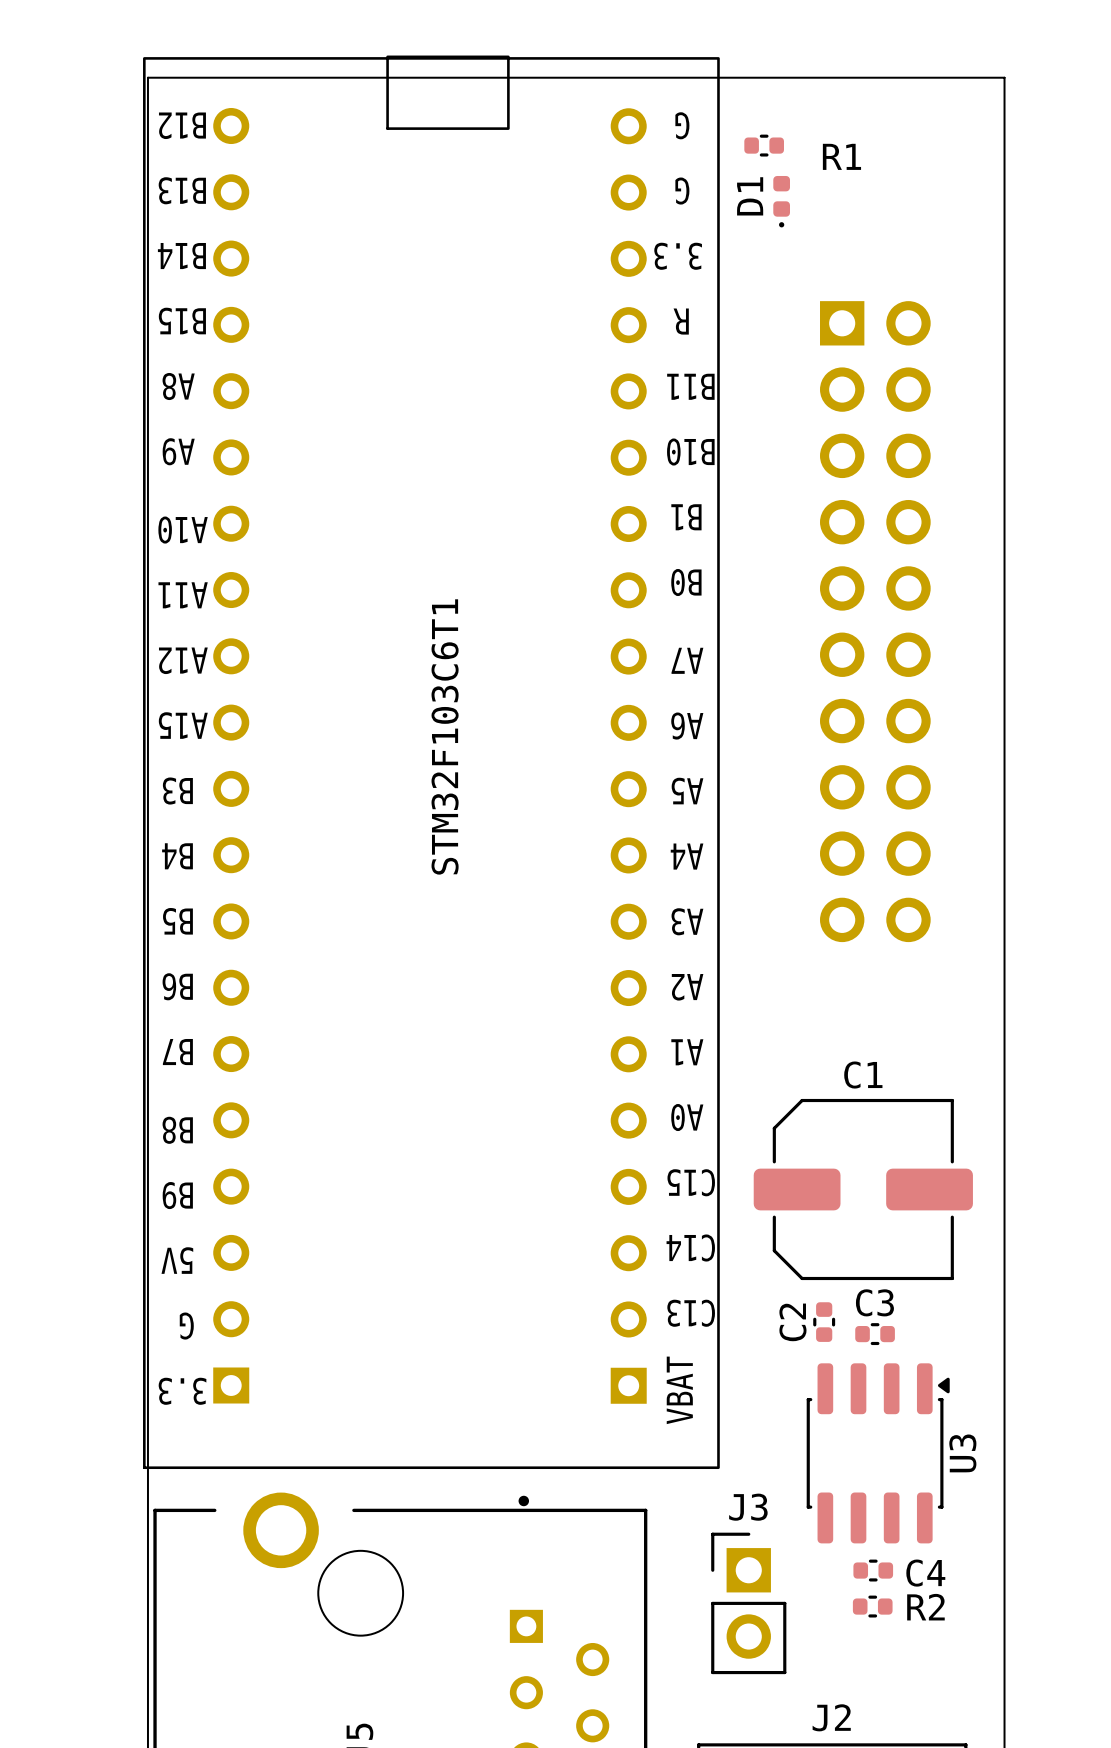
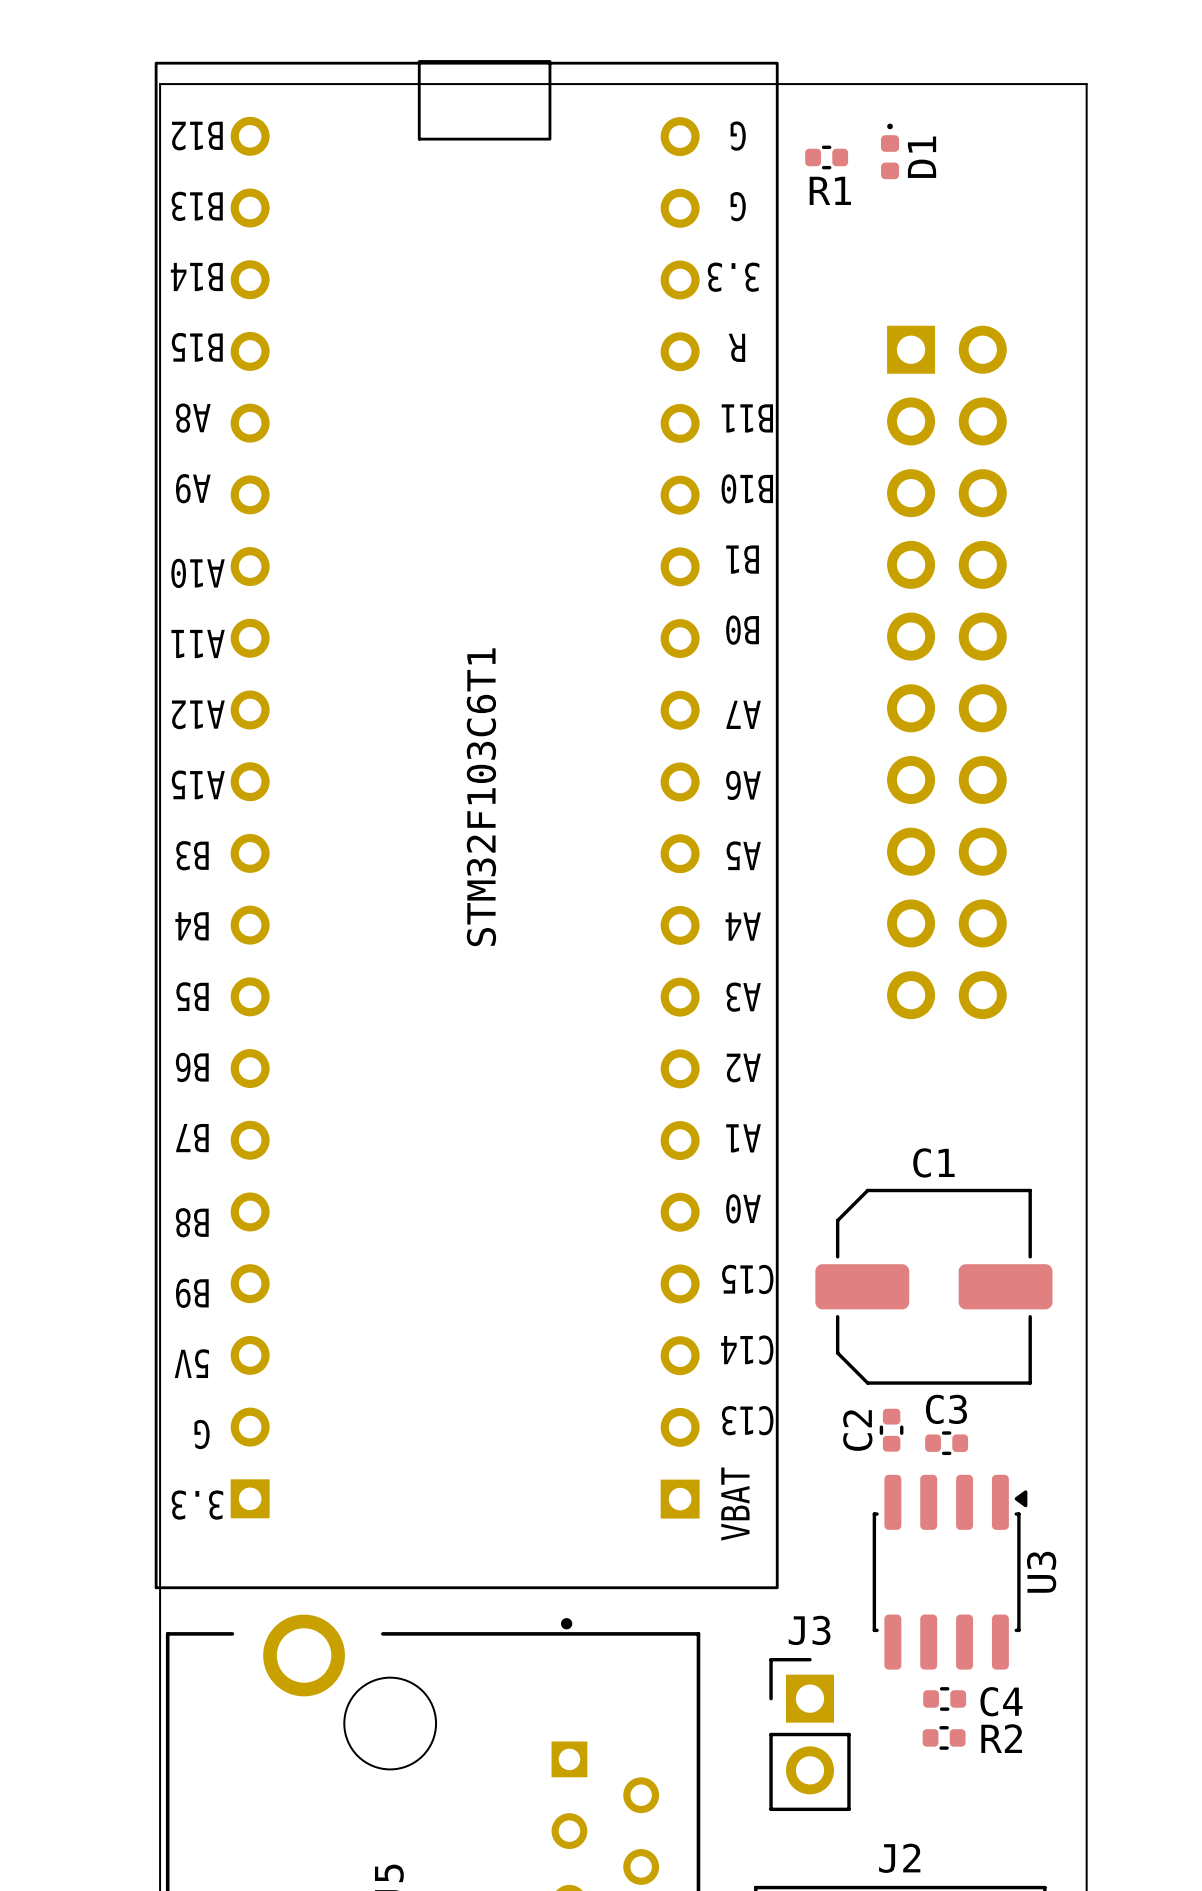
R1 name position: R1 (841, 156) -> R1 (830, 190)
D1 rotation: 0° (781, 201) -> 180° (890, 151)
D1 position: (781, 201) -> (890, 151)

